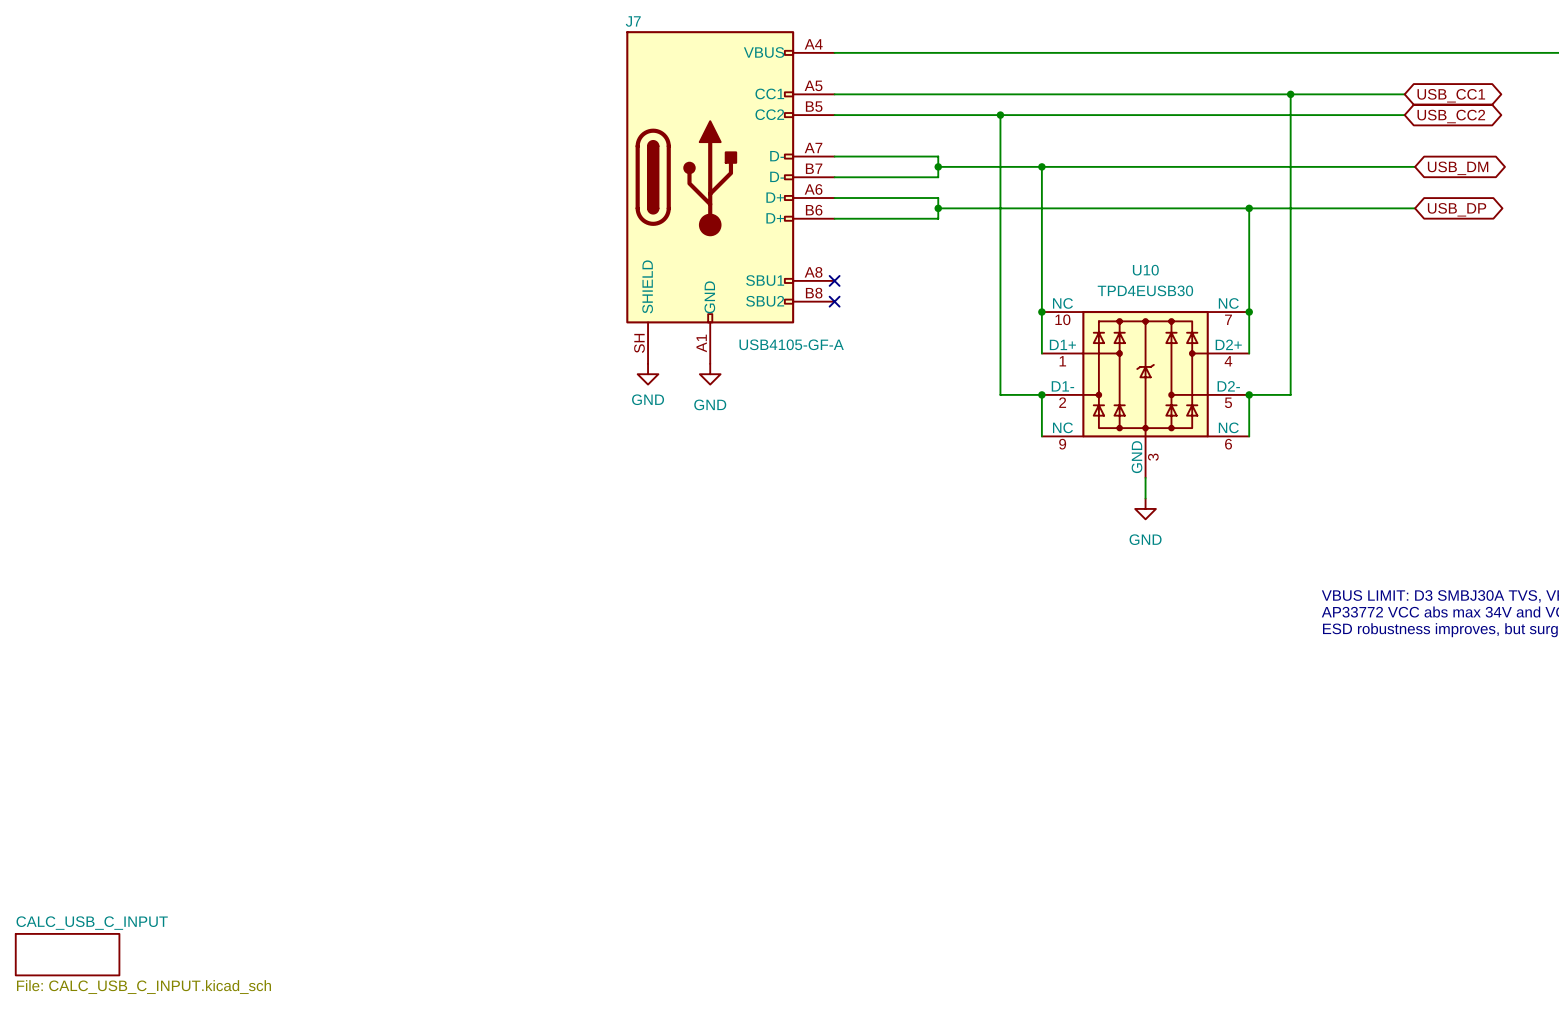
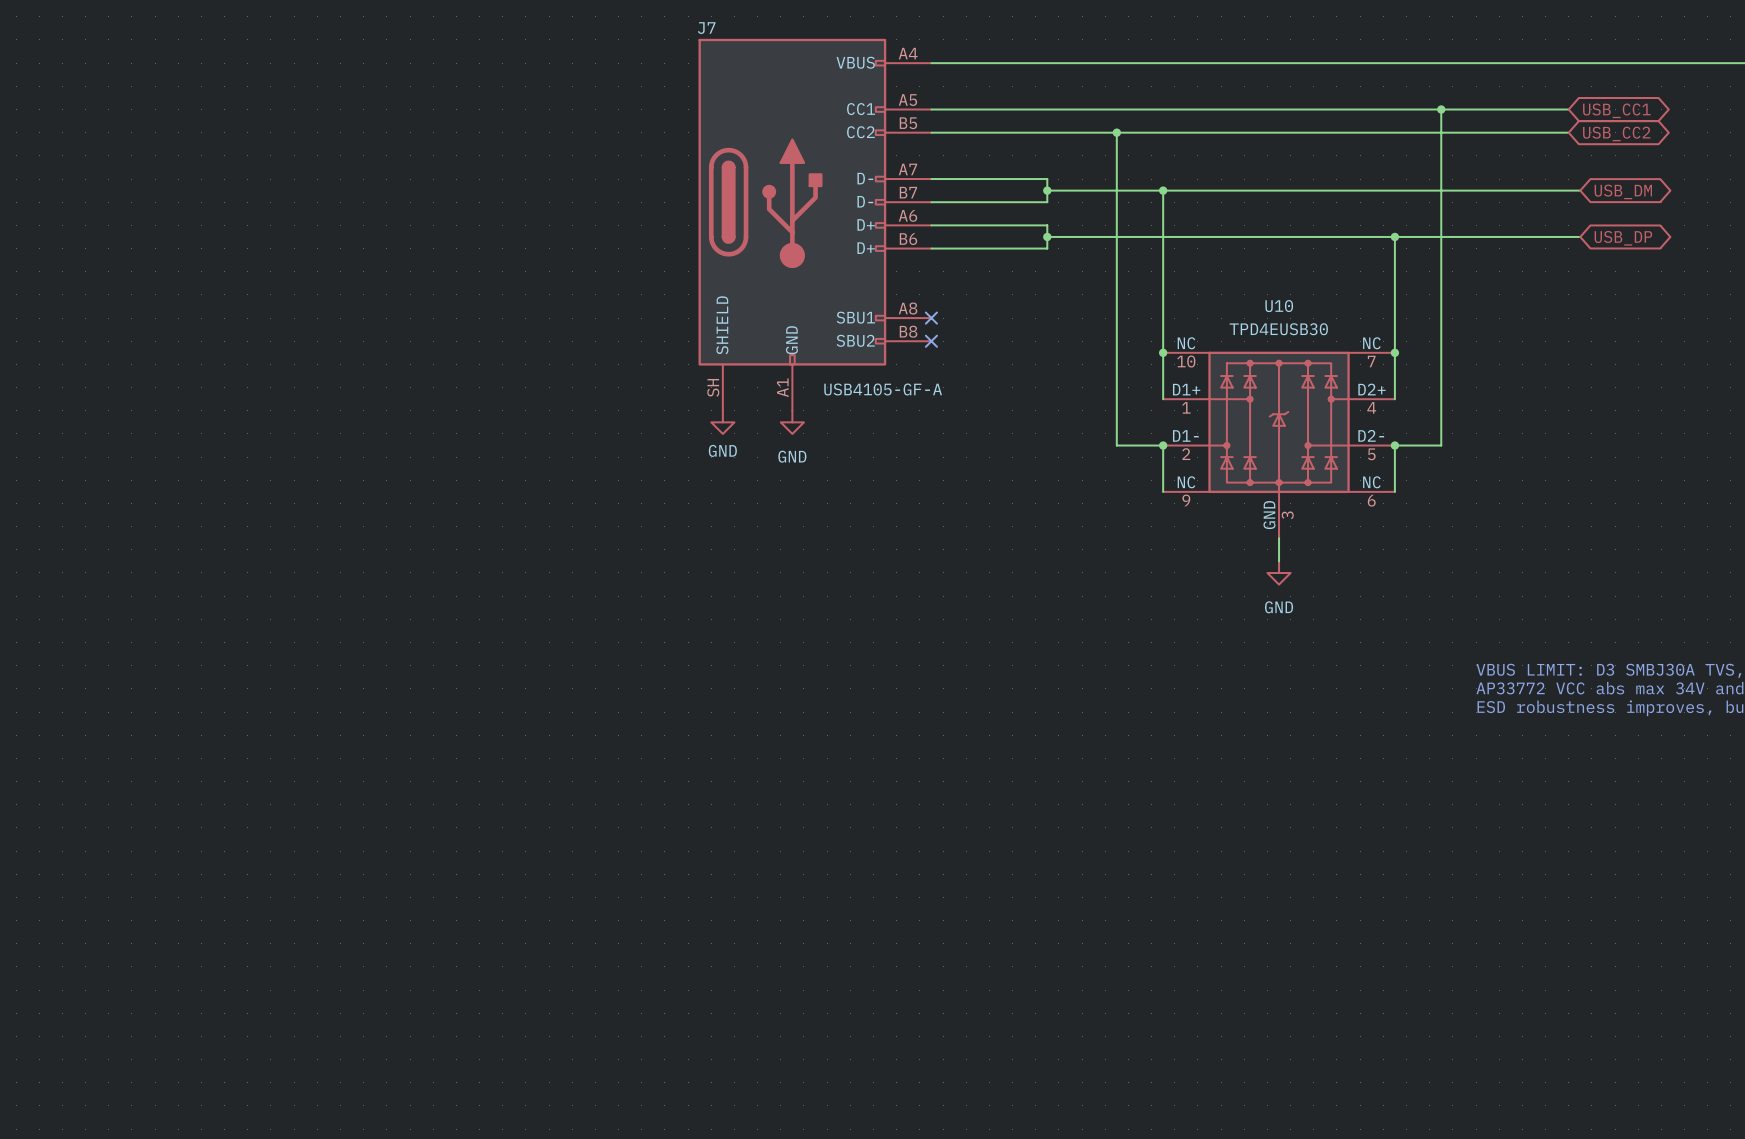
sheet CALC_USB_C_INPUT: File: CALC_USB_C_INPUT.kicad_sch (67, 954) -> none

